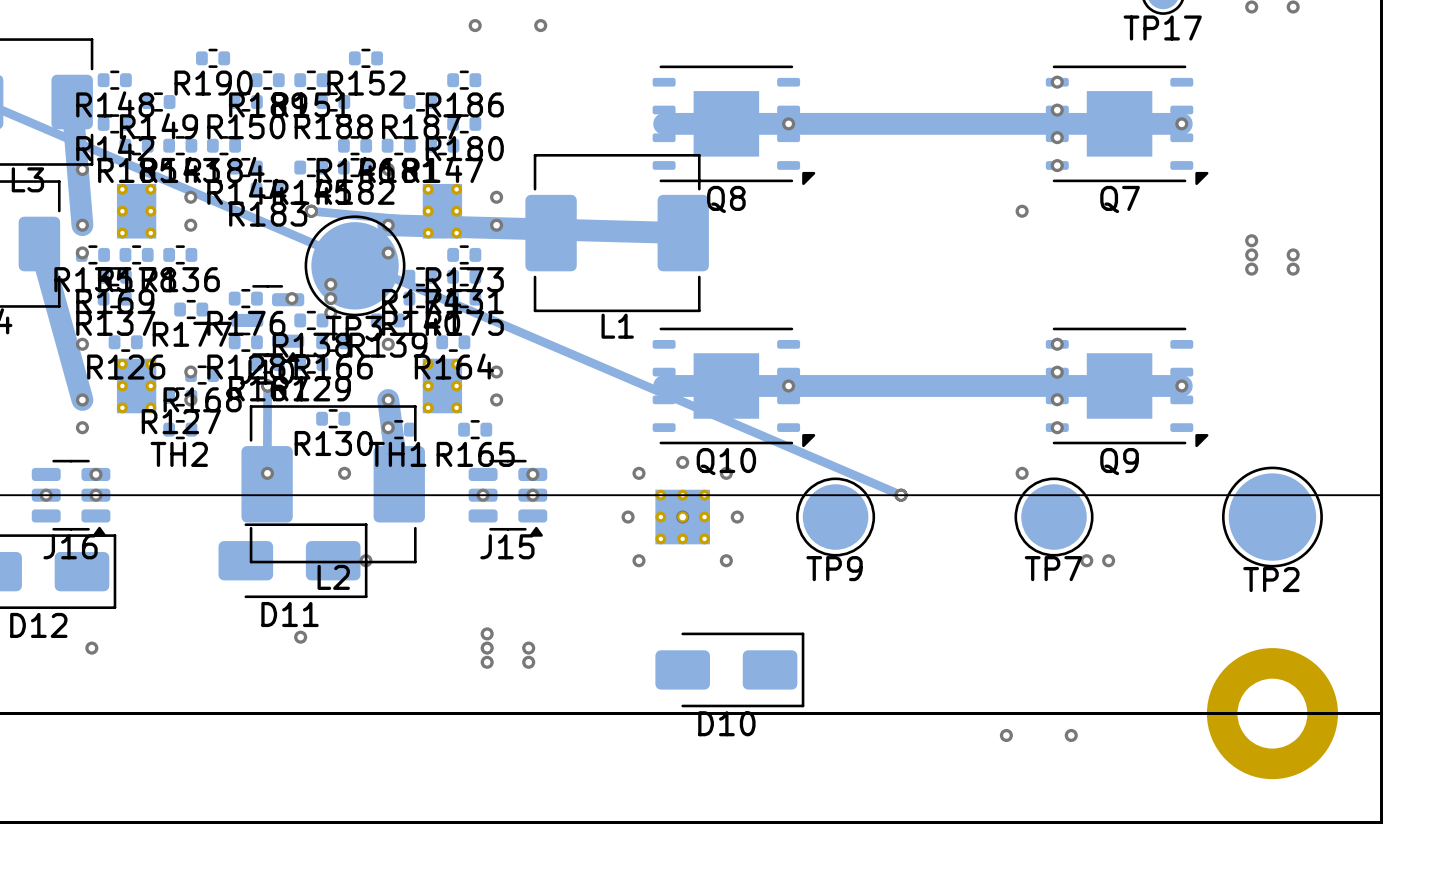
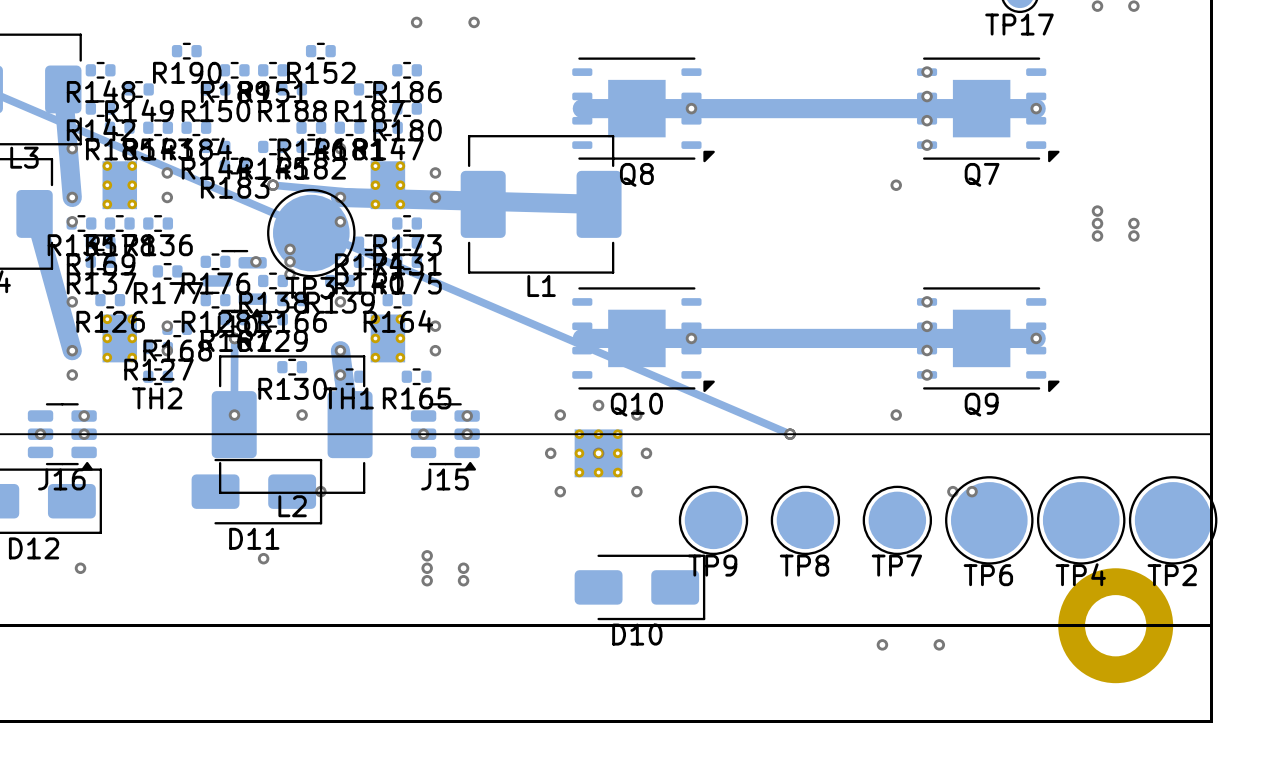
TP9 position: (835, 517) -> (713, 520)
TP7 position: (1054, 517) -> (897, 520)
TP2 position: (1272, 517) -> (1173, 520)
TP8: none -> (805, 520)
TP6: none -> (989, 520)
TP4: none -> (1081, 520)

